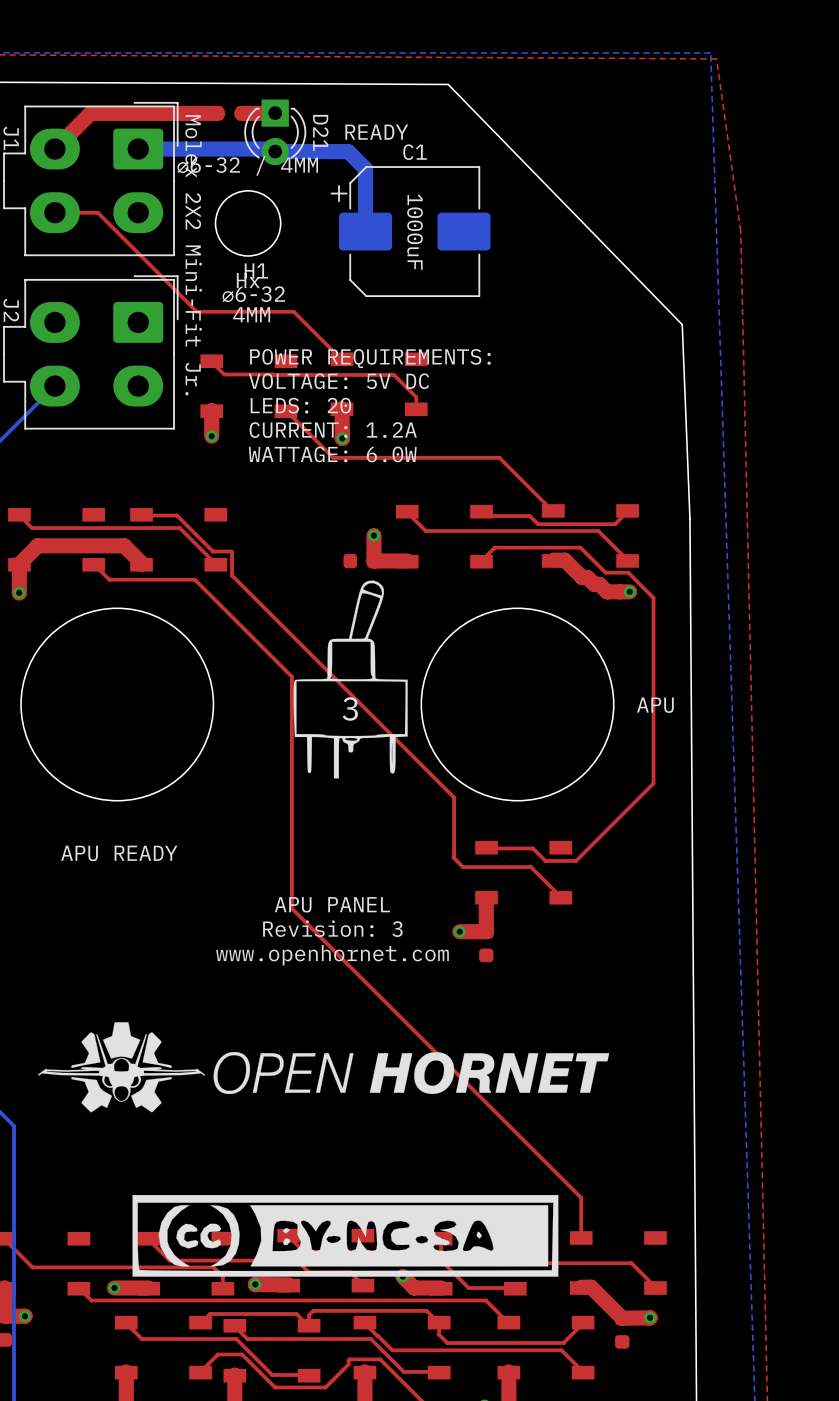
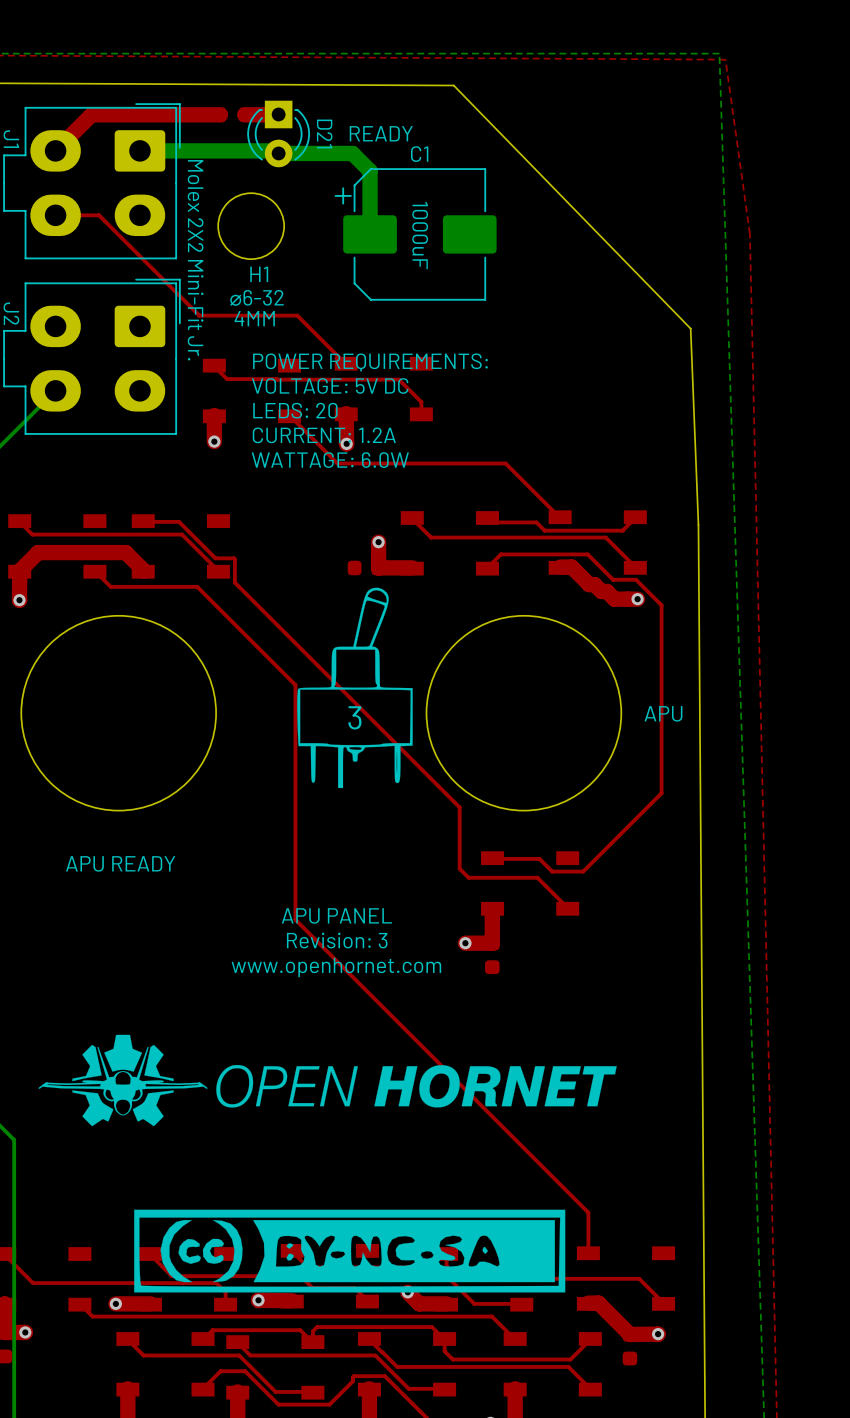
part text: ⌀6-32 / 4MM (247, 165) -> none
part text: Hx (248, 280) -> none

